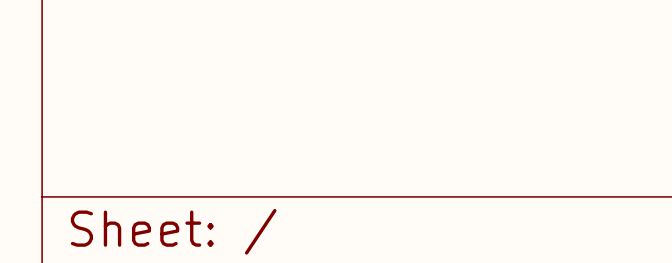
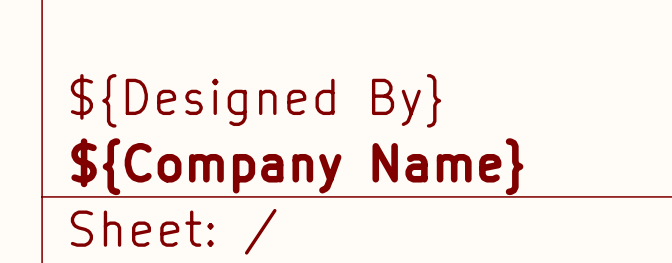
title block: none -> ${Designed By} (256, 100)
title block: none -> ${Company Name} (297, 166)

